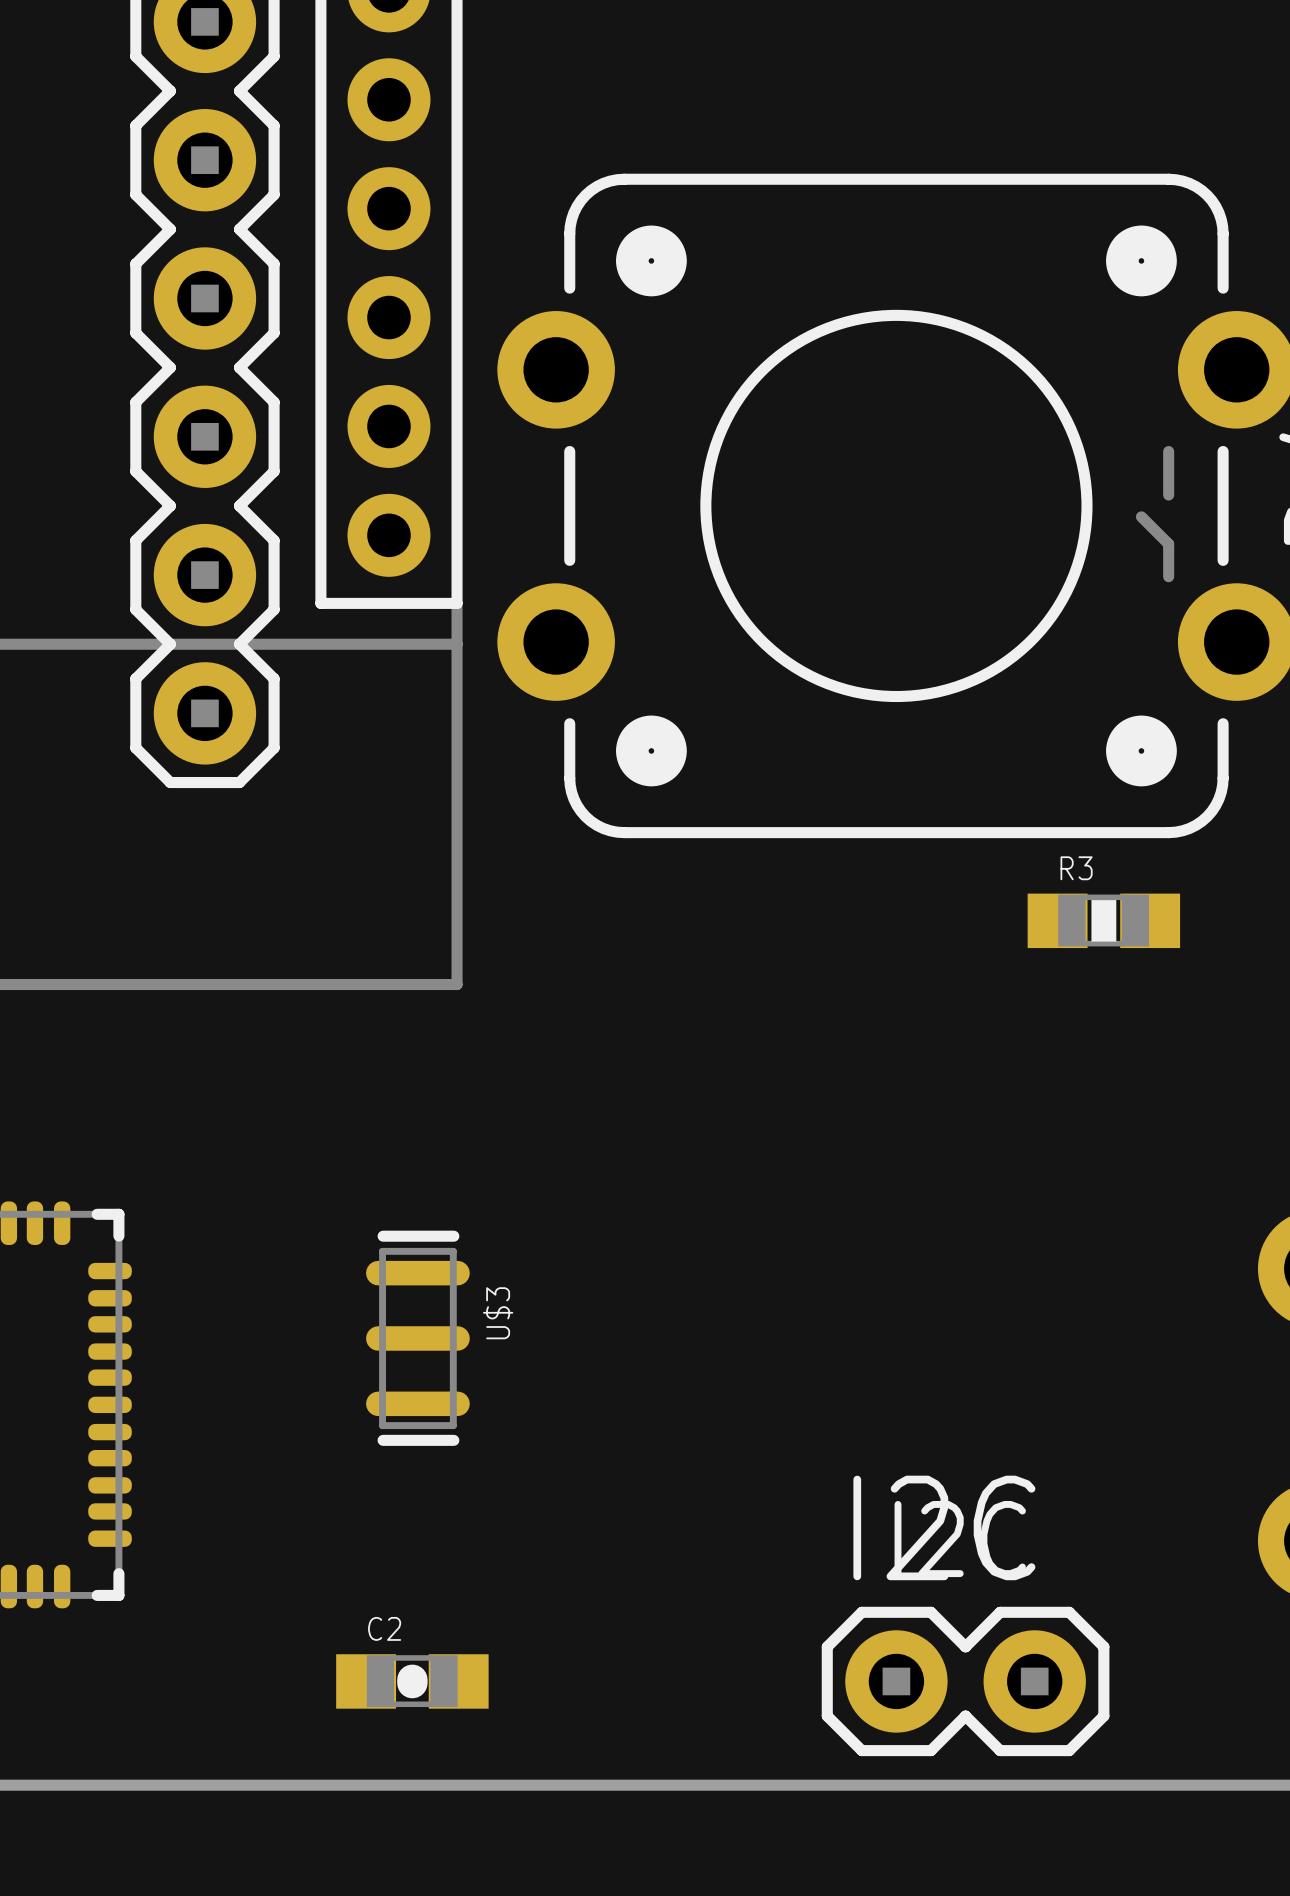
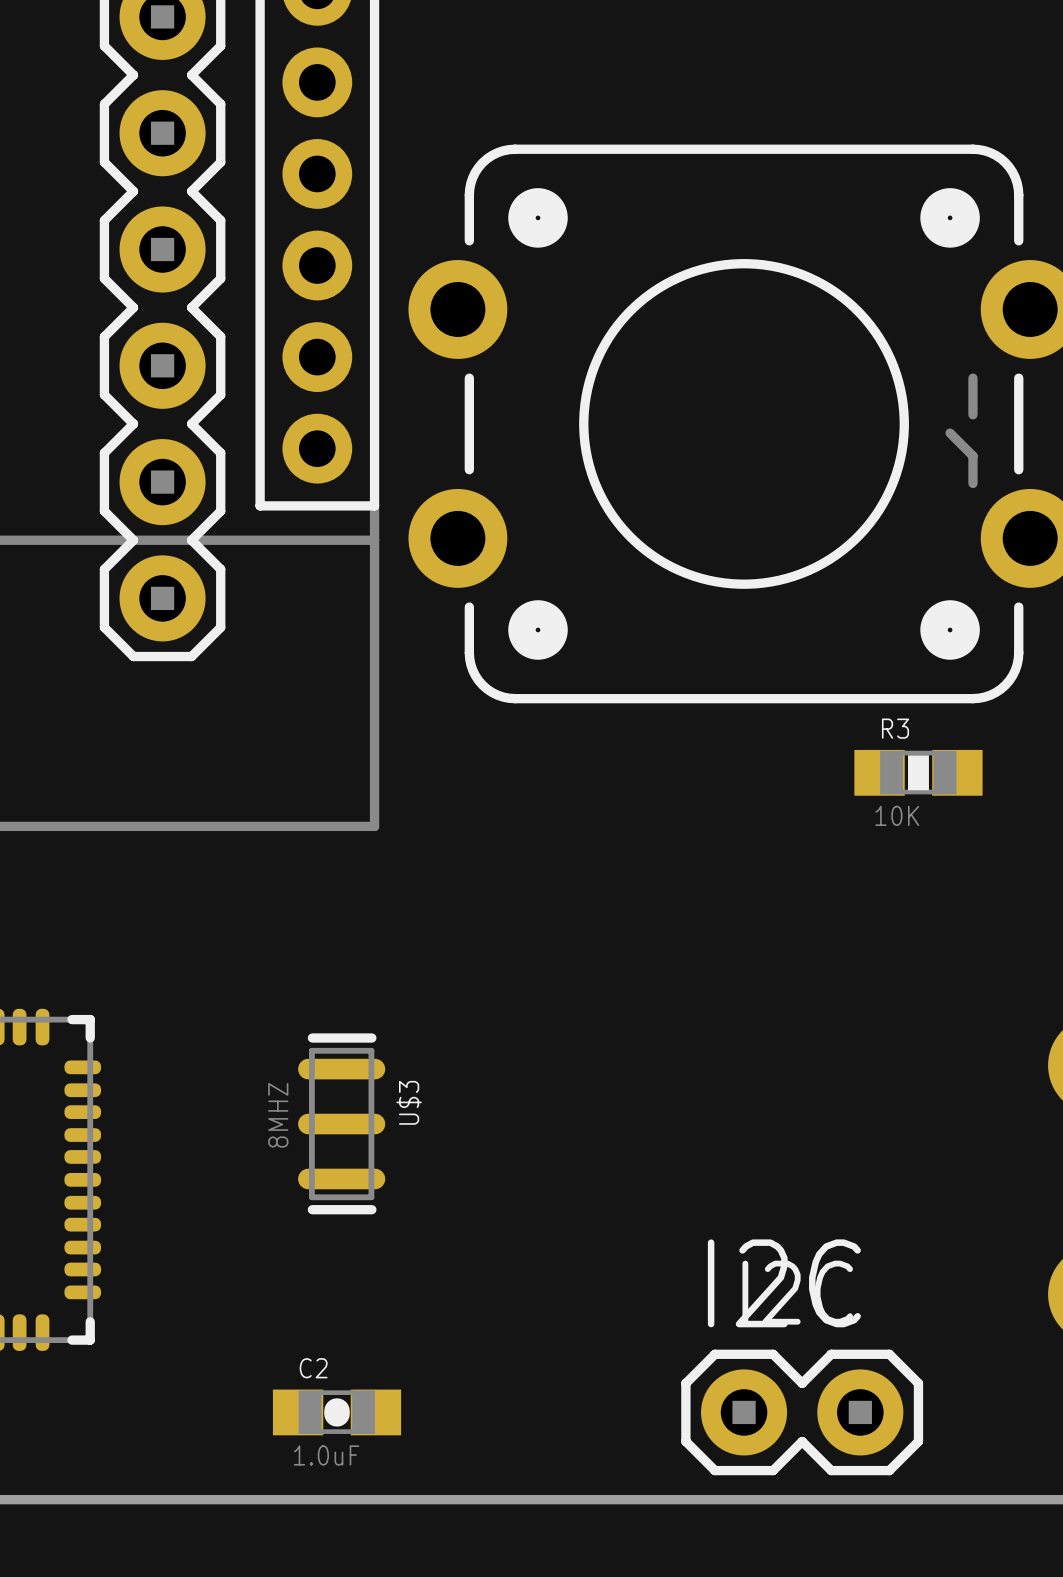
R3 value: none -> 10K (897, 815)
U$3 value: none -> 8MHZ (278, 1115)
C2 value: none -> 1.0uF (326, 1455)

